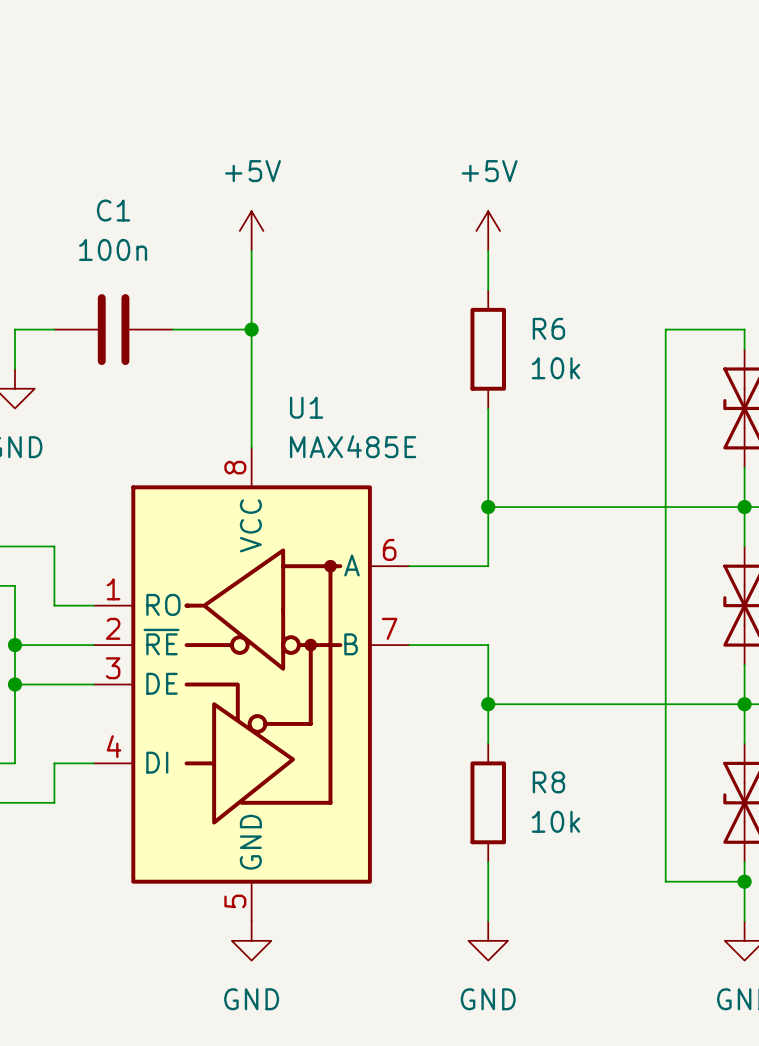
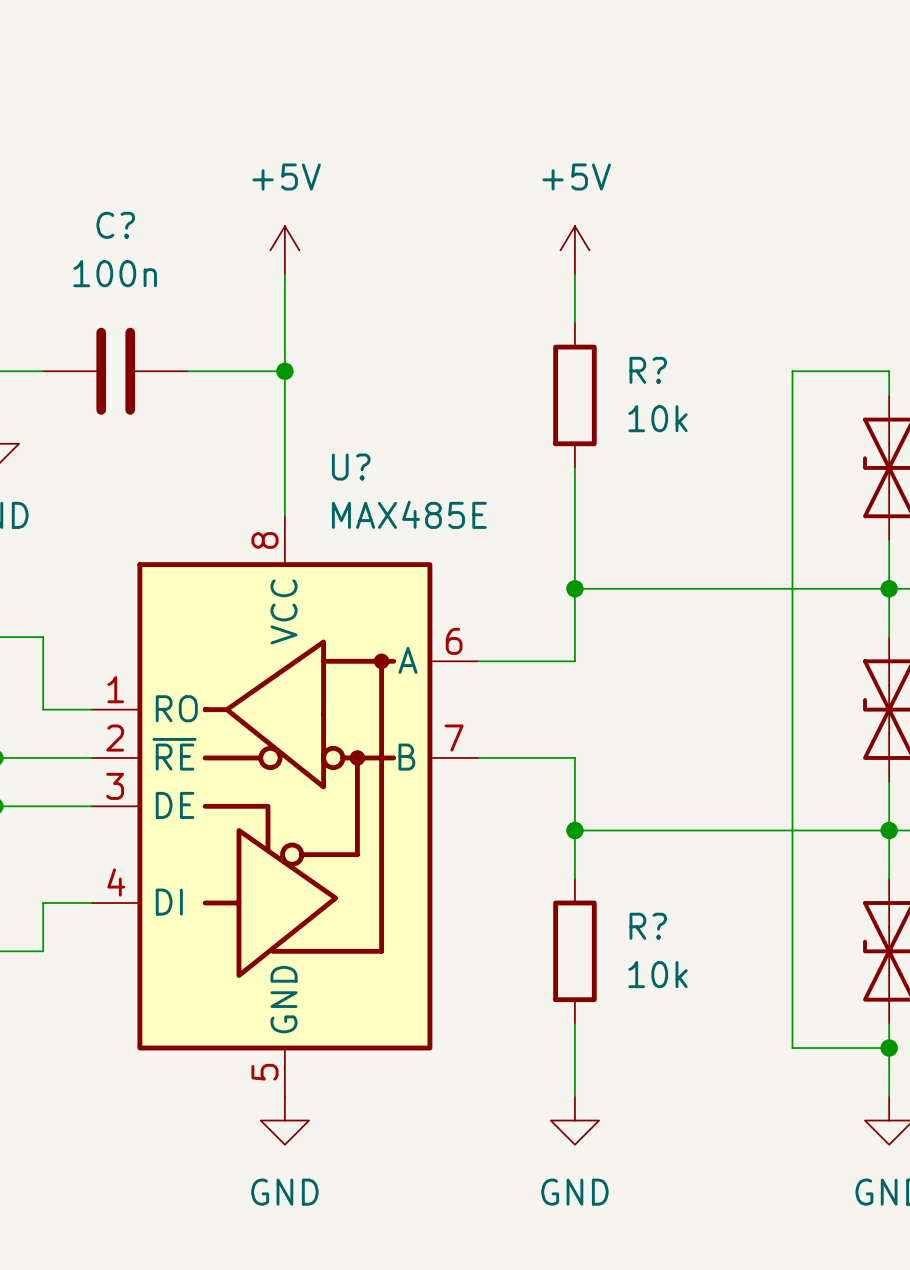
C1 name: C1 (113, 210) -> C? (115, 225)
R6 name: R6 (548, 328) -> R? (648, 370)
U1 name: U1 (306, 407) -> U? (351, 467)
R8 name: R8 (548, 782) -> R? (648, 926)

